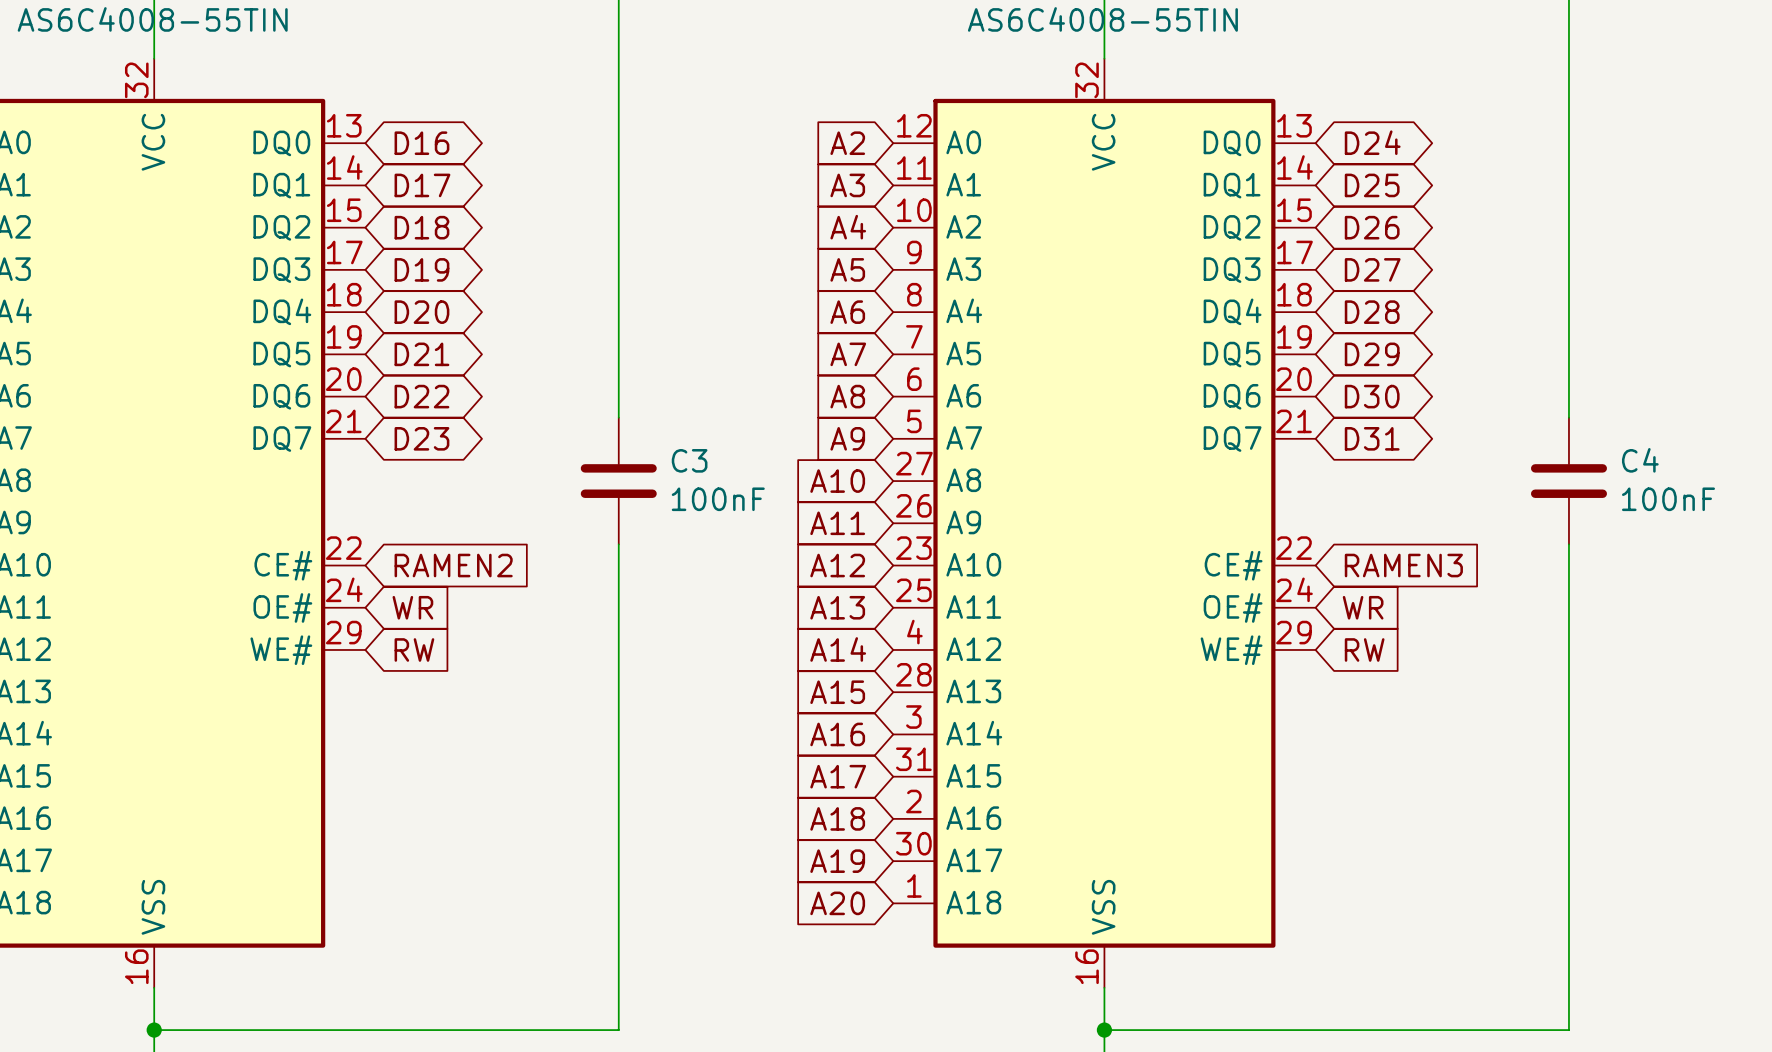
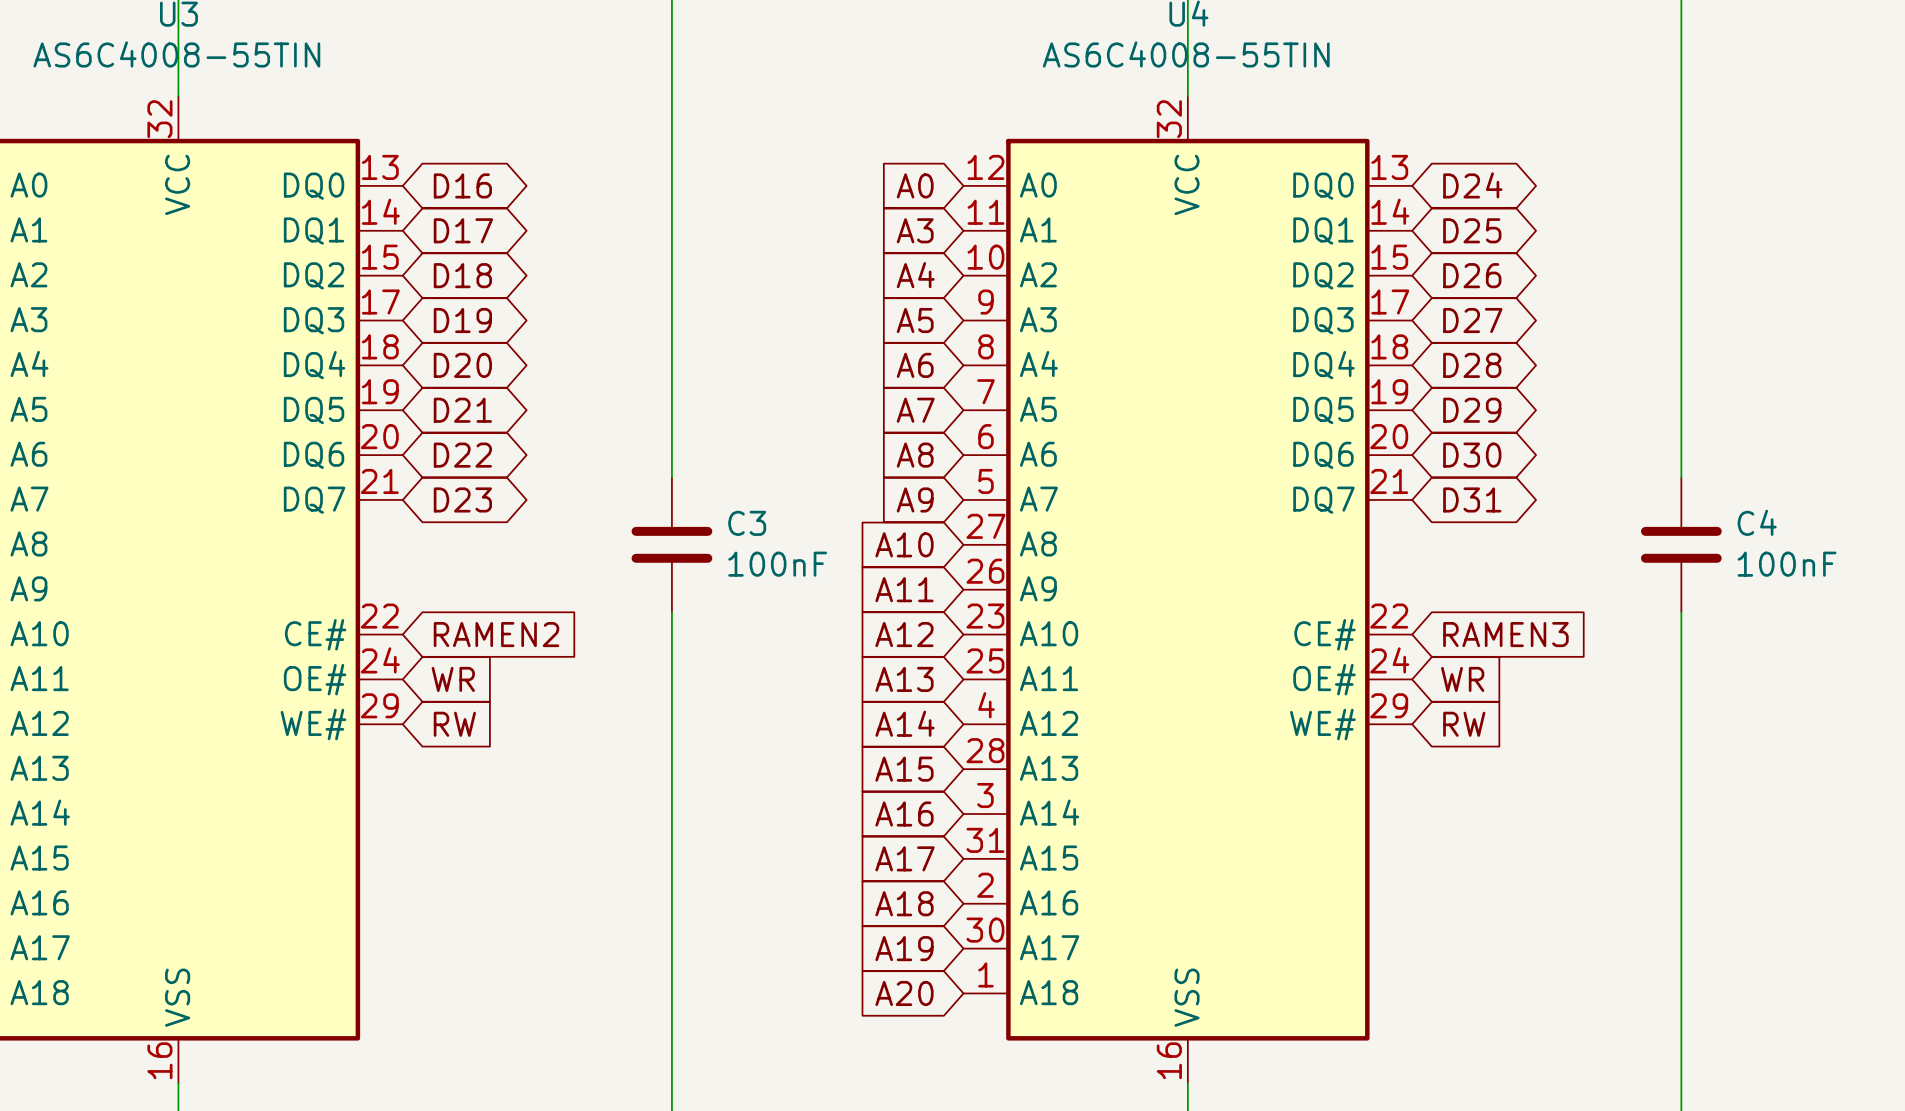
global label: A2 (847, 143) -> A0 (915, 185)

